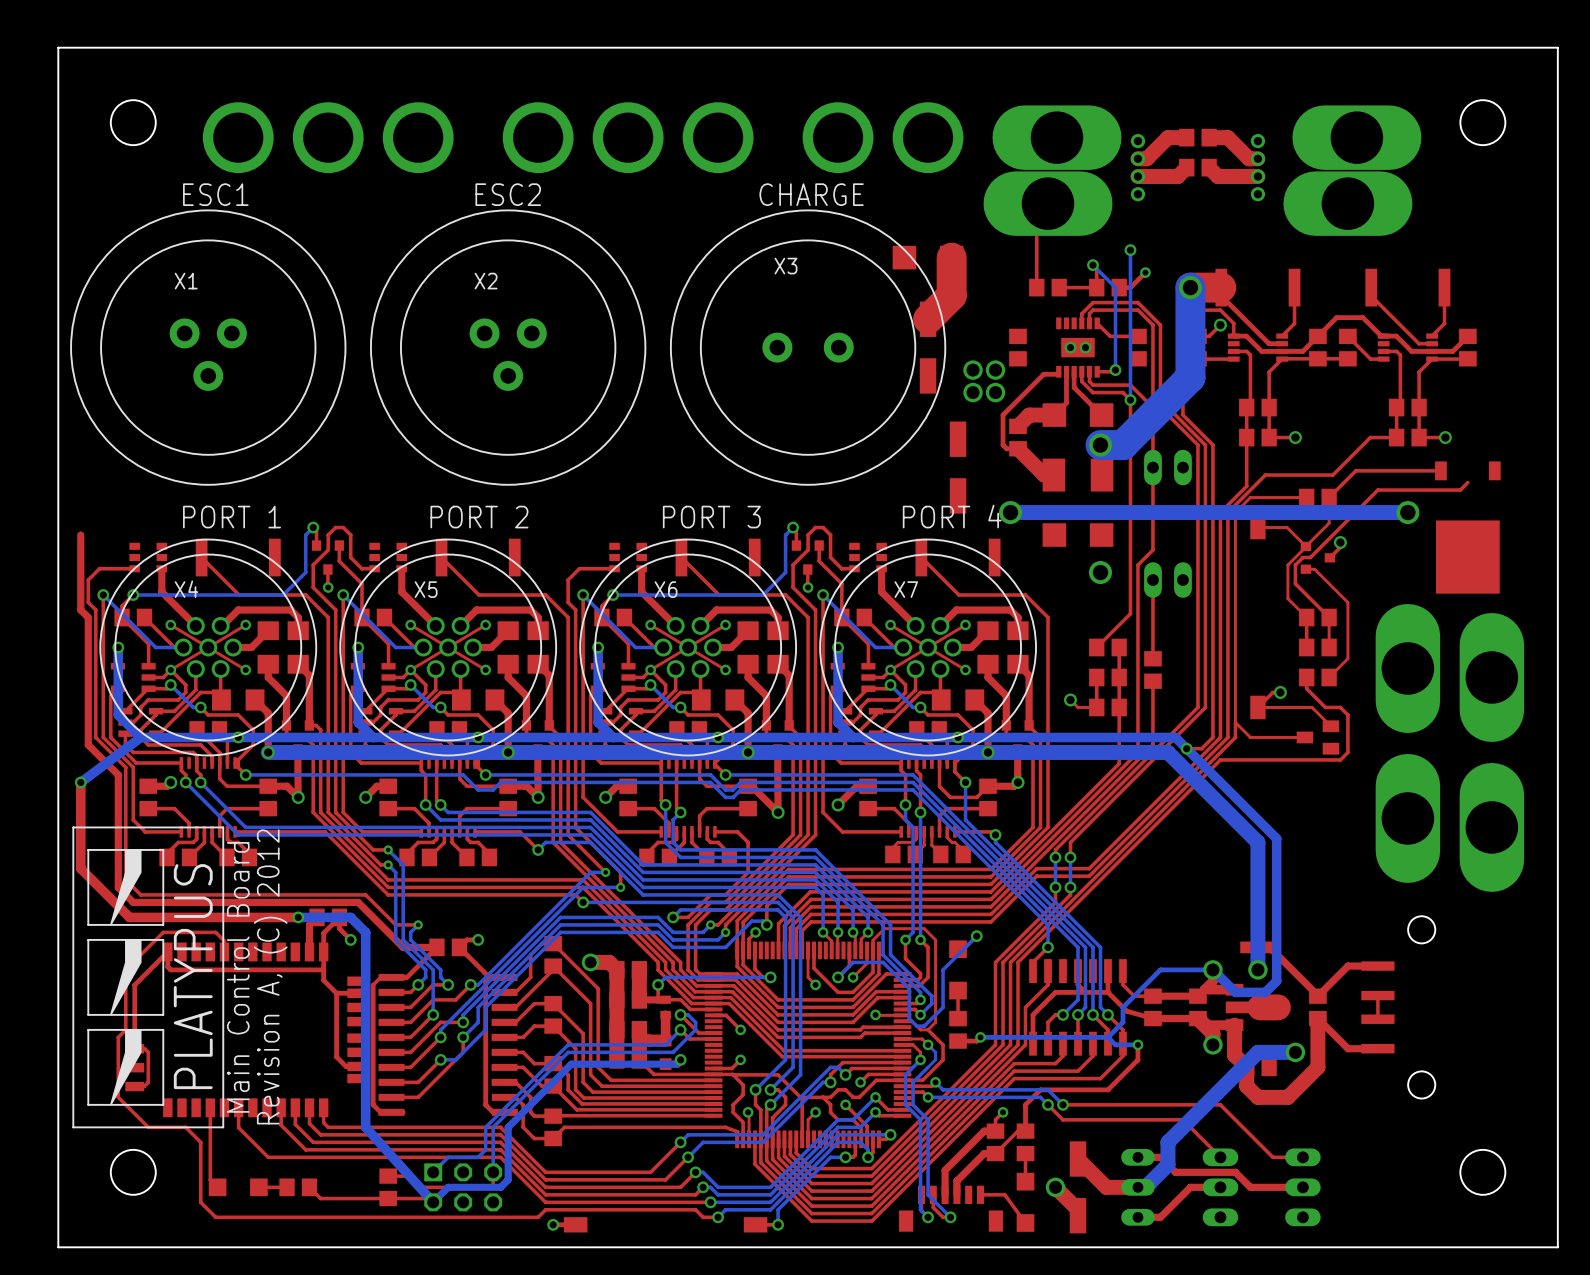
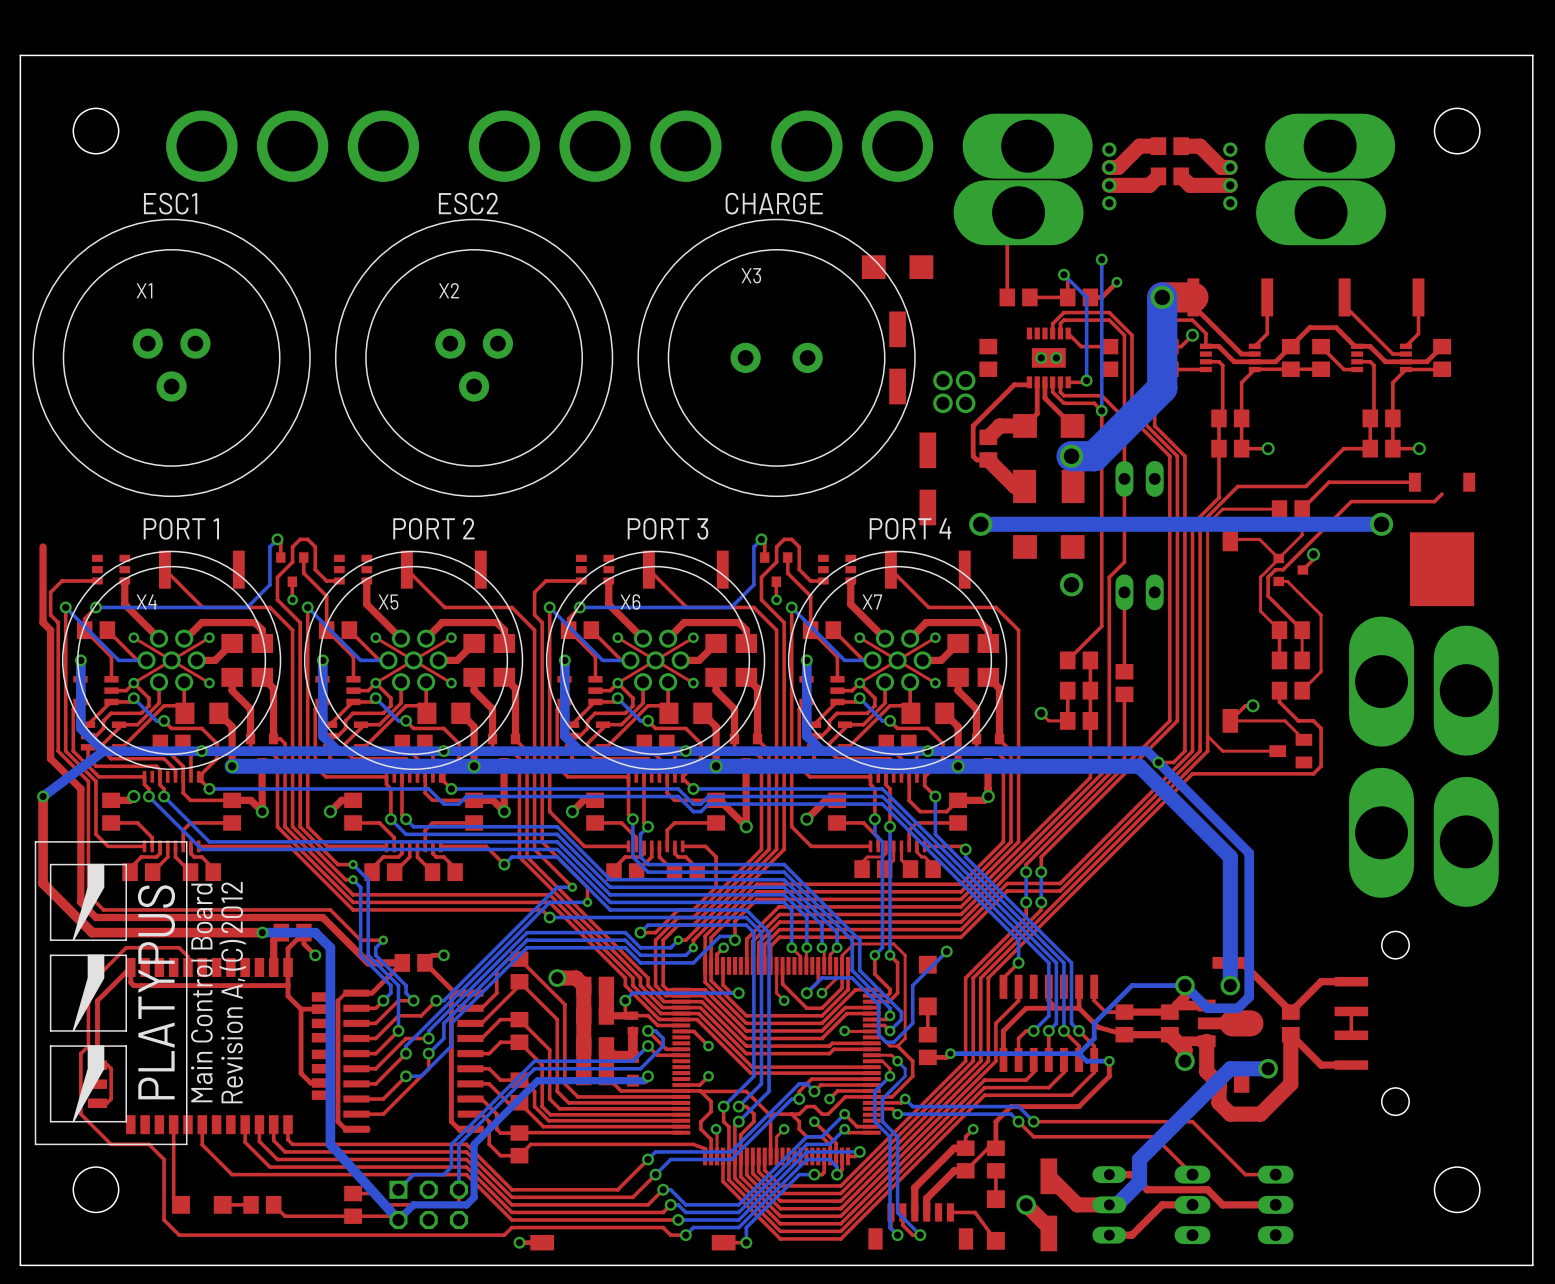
top track: (951, 257) (951, 295) (928, 319) -> none

